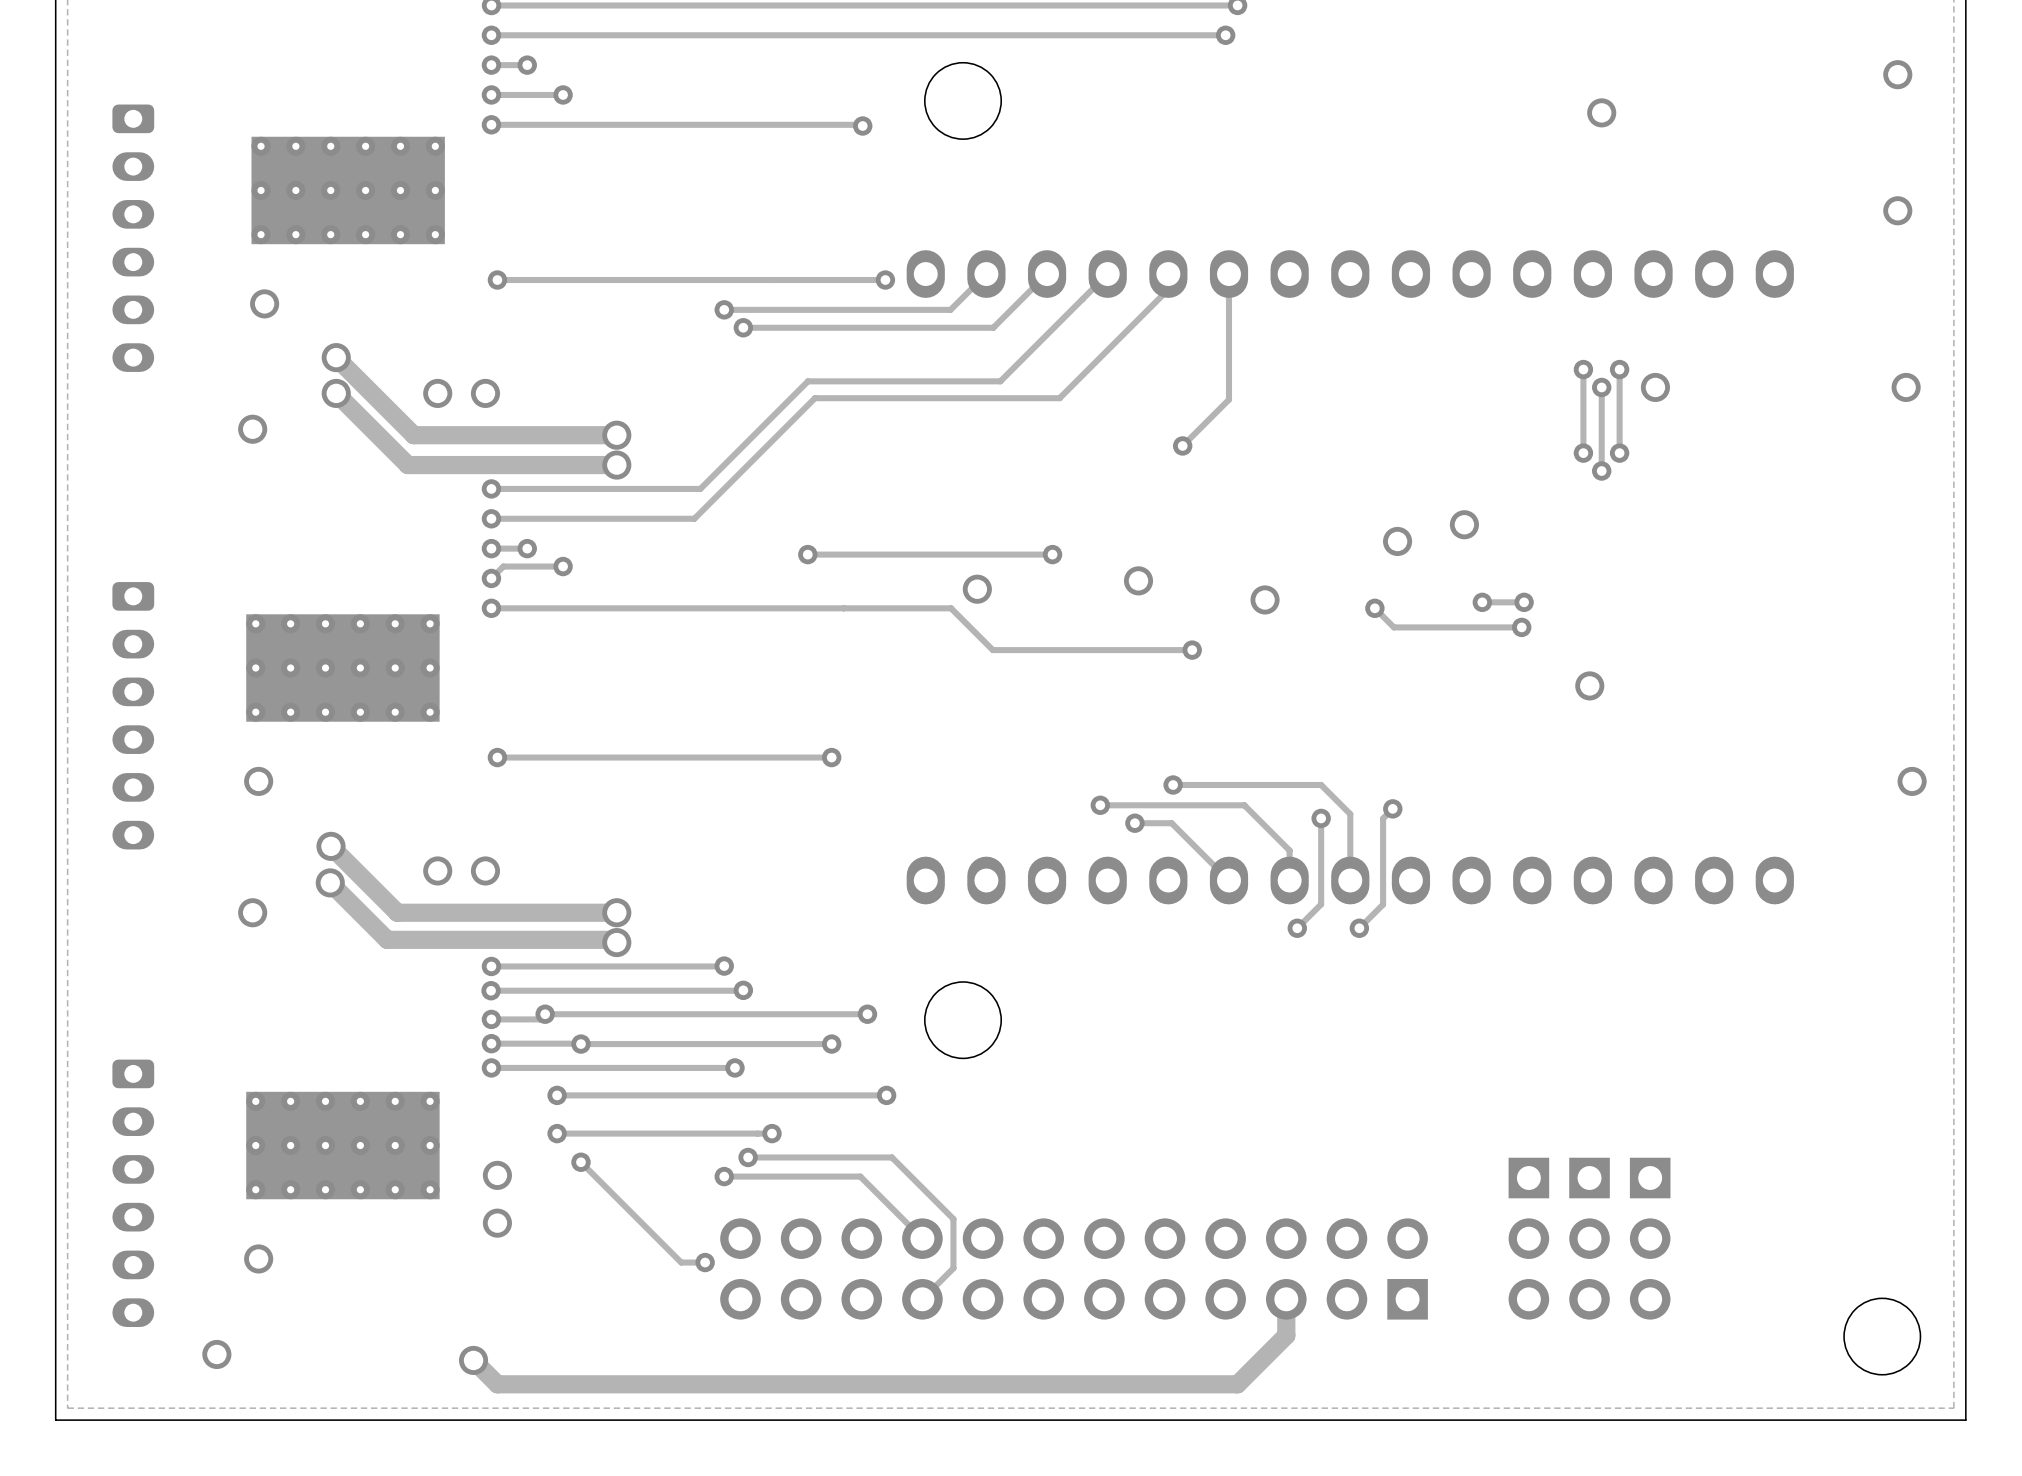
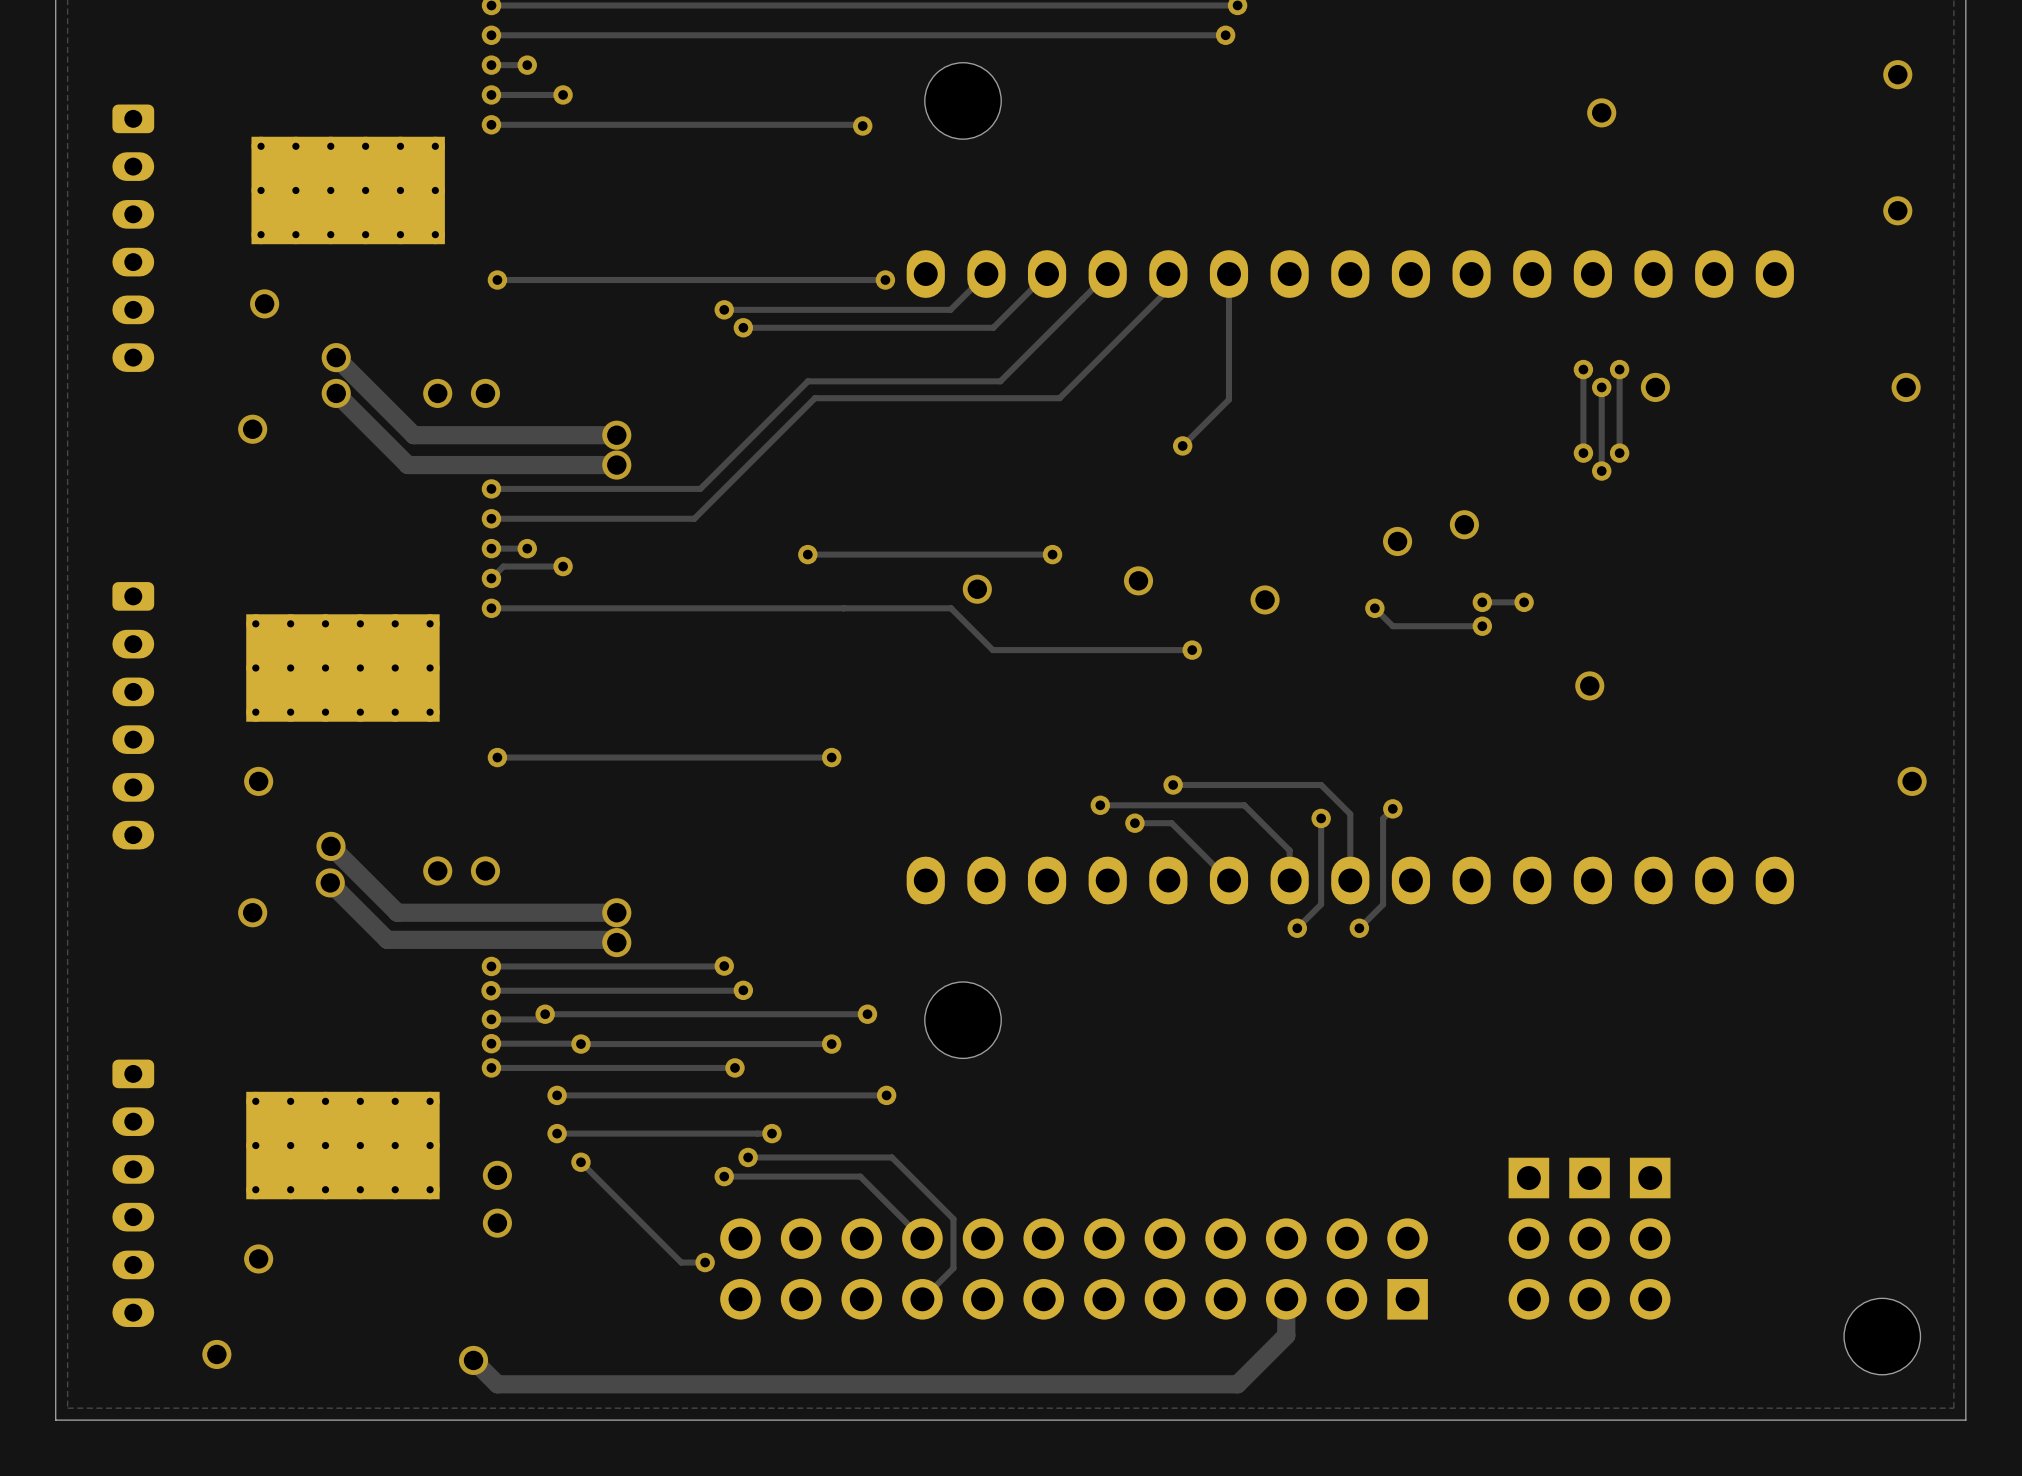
track: (1392, 626) (1521, 627) -> (1392, 626) (1482, 626)
via position: (1521, 627) -> (1482, 626)

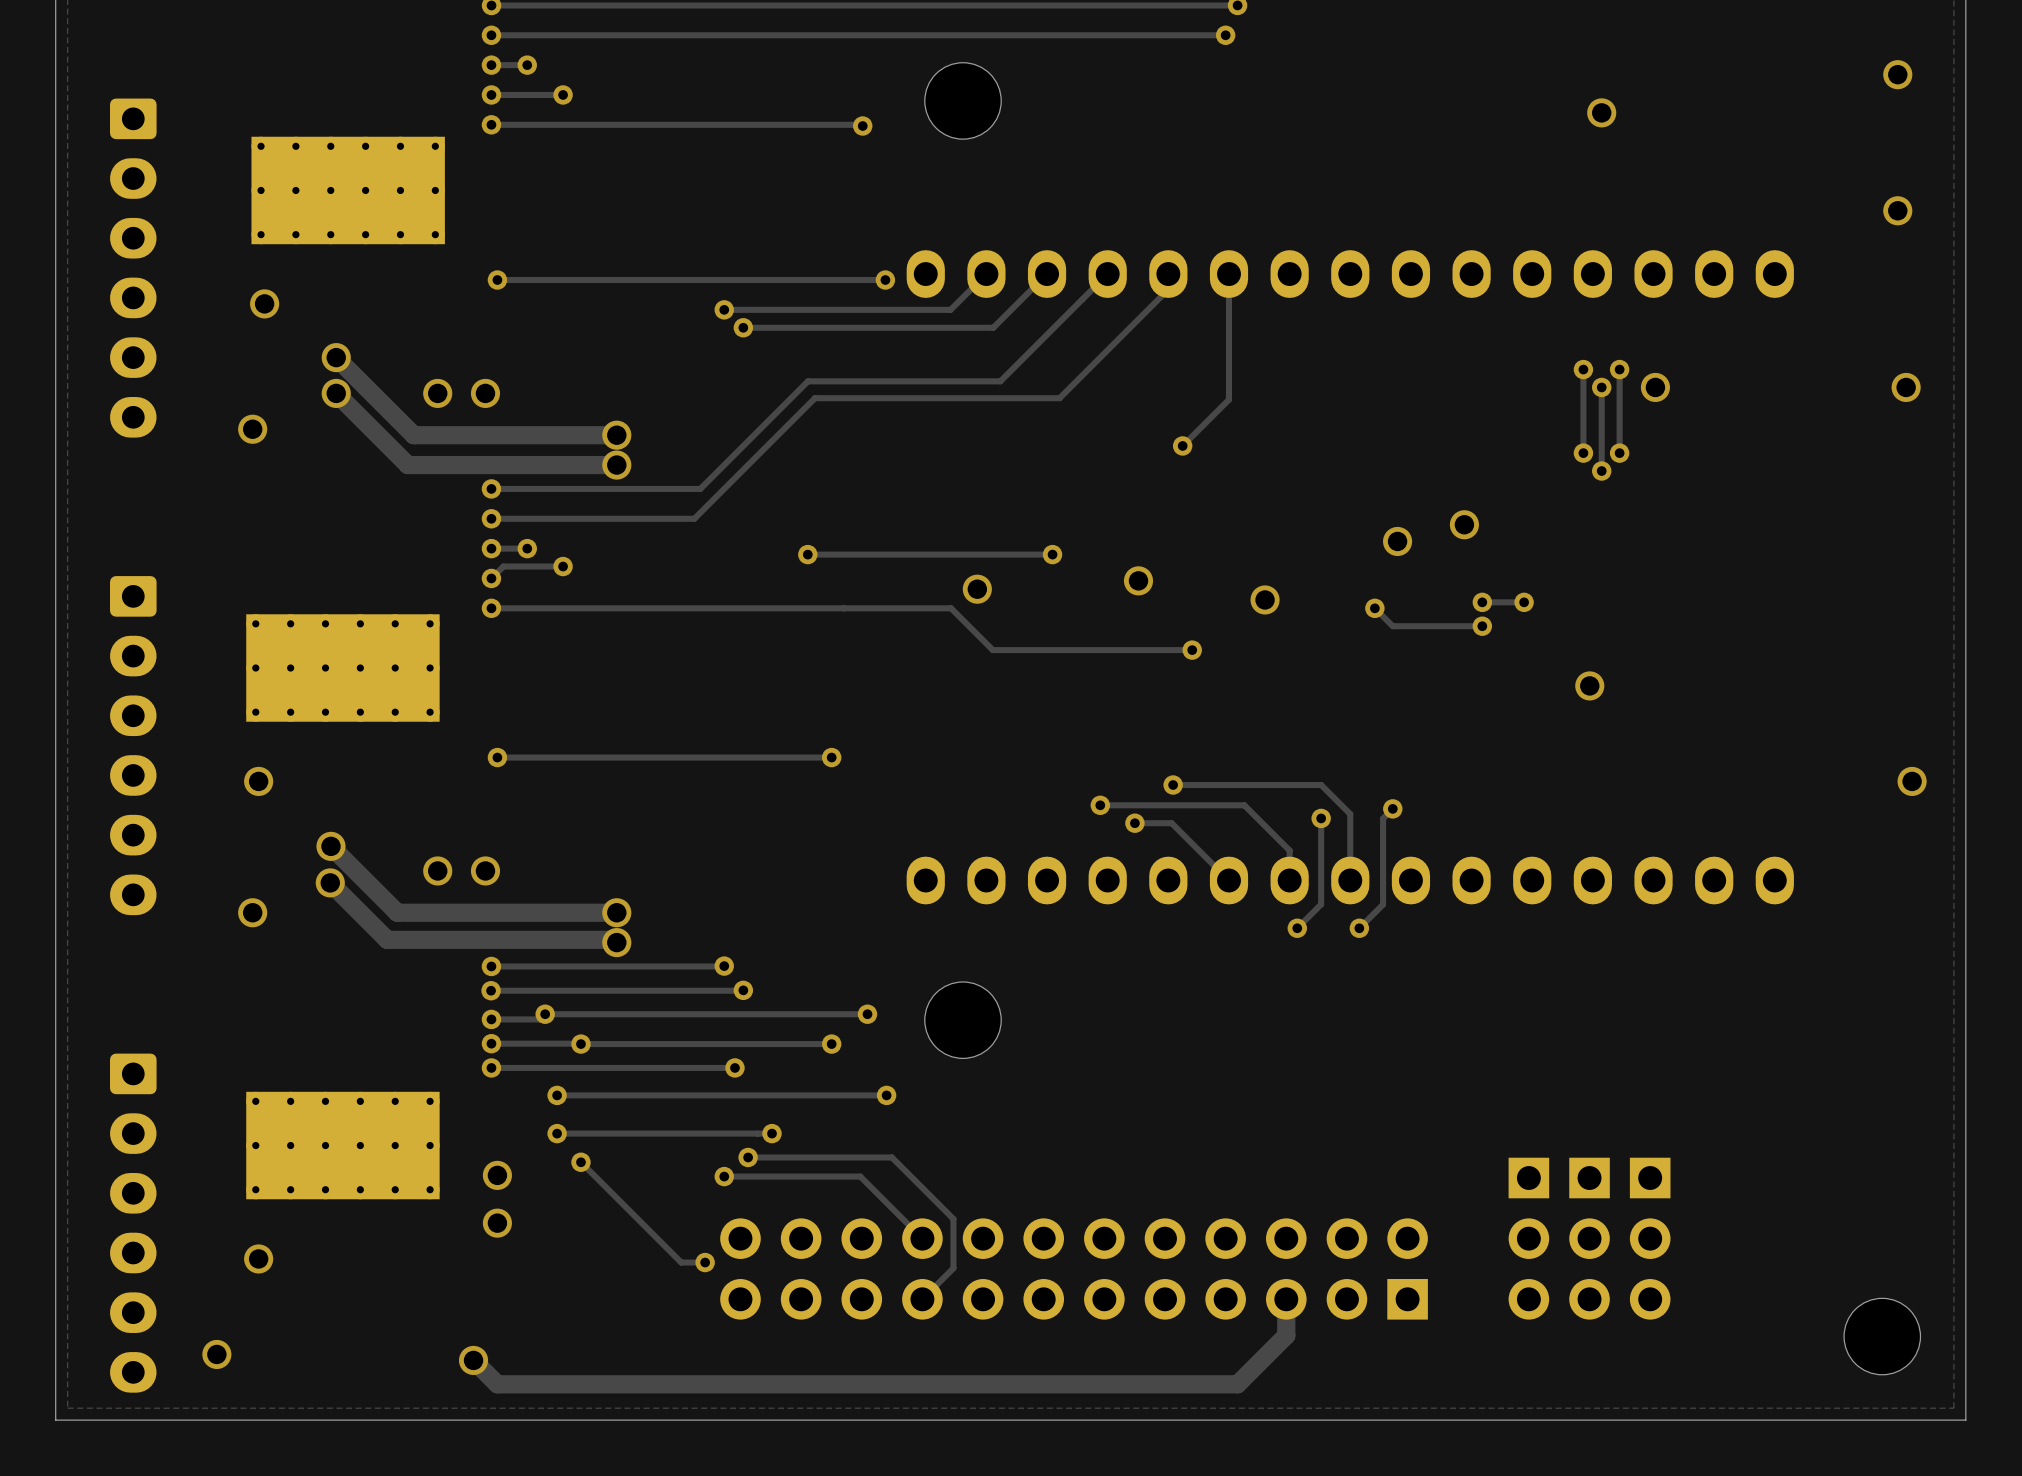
part: (133, 238) -> none
part: none -> (133, 268)
part: (133, 715) -> none
part: none -> (133, 745)
part: (133, 1193) -> none
part: none -> (133, 1223)

